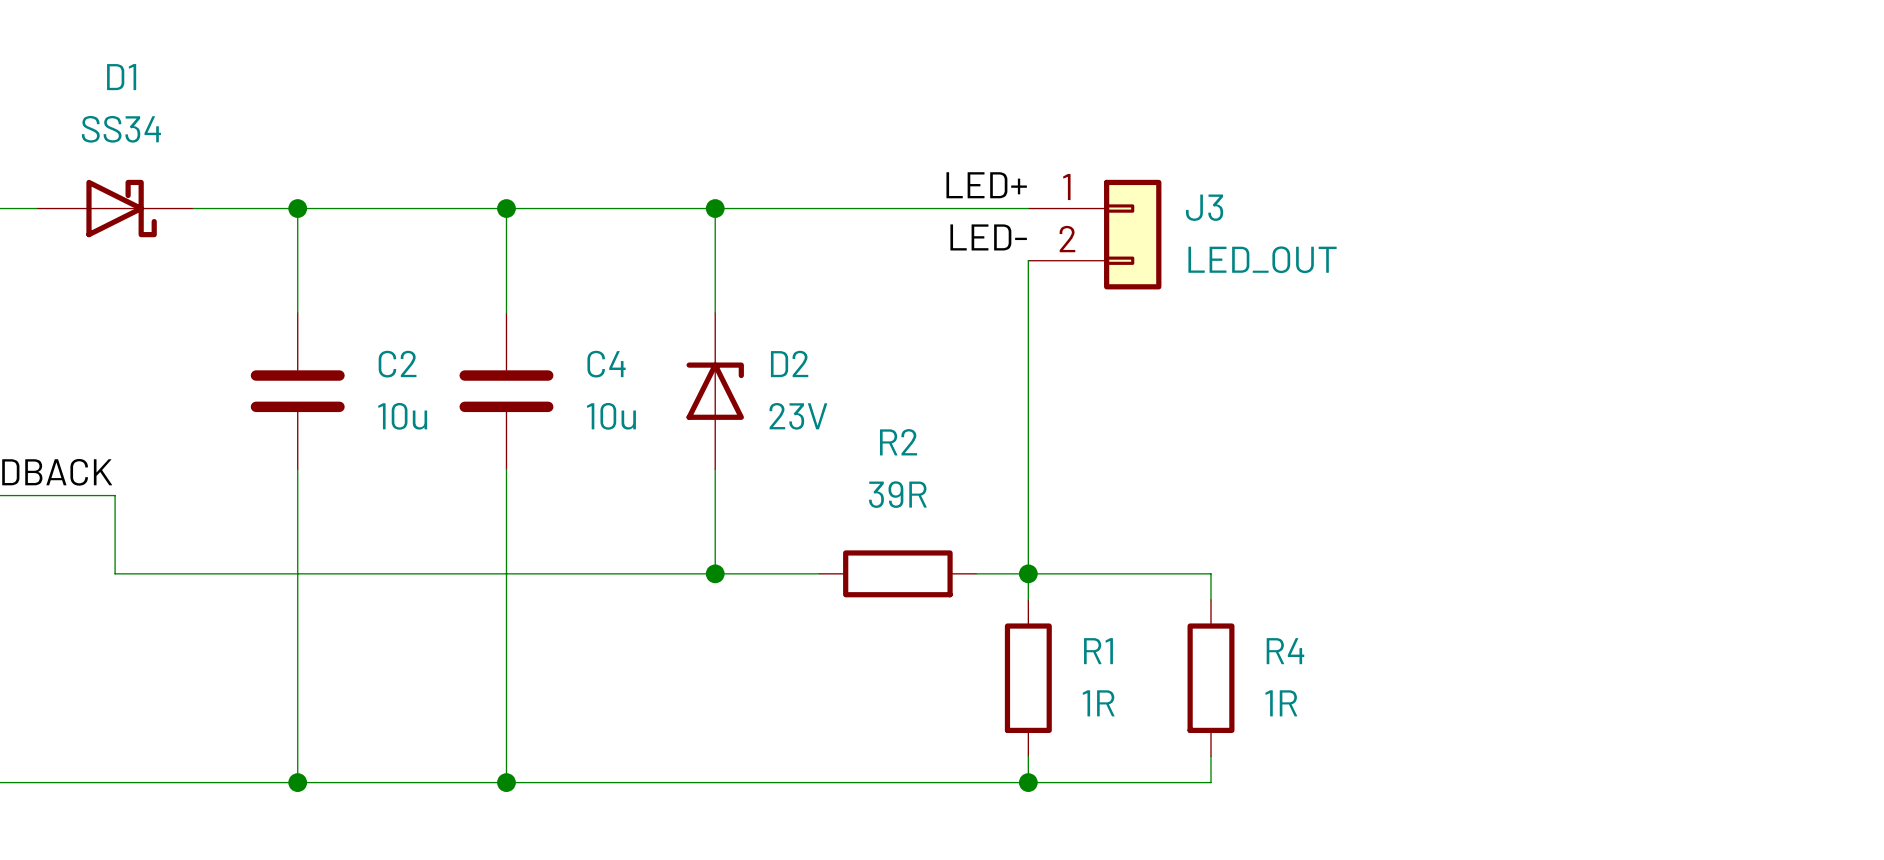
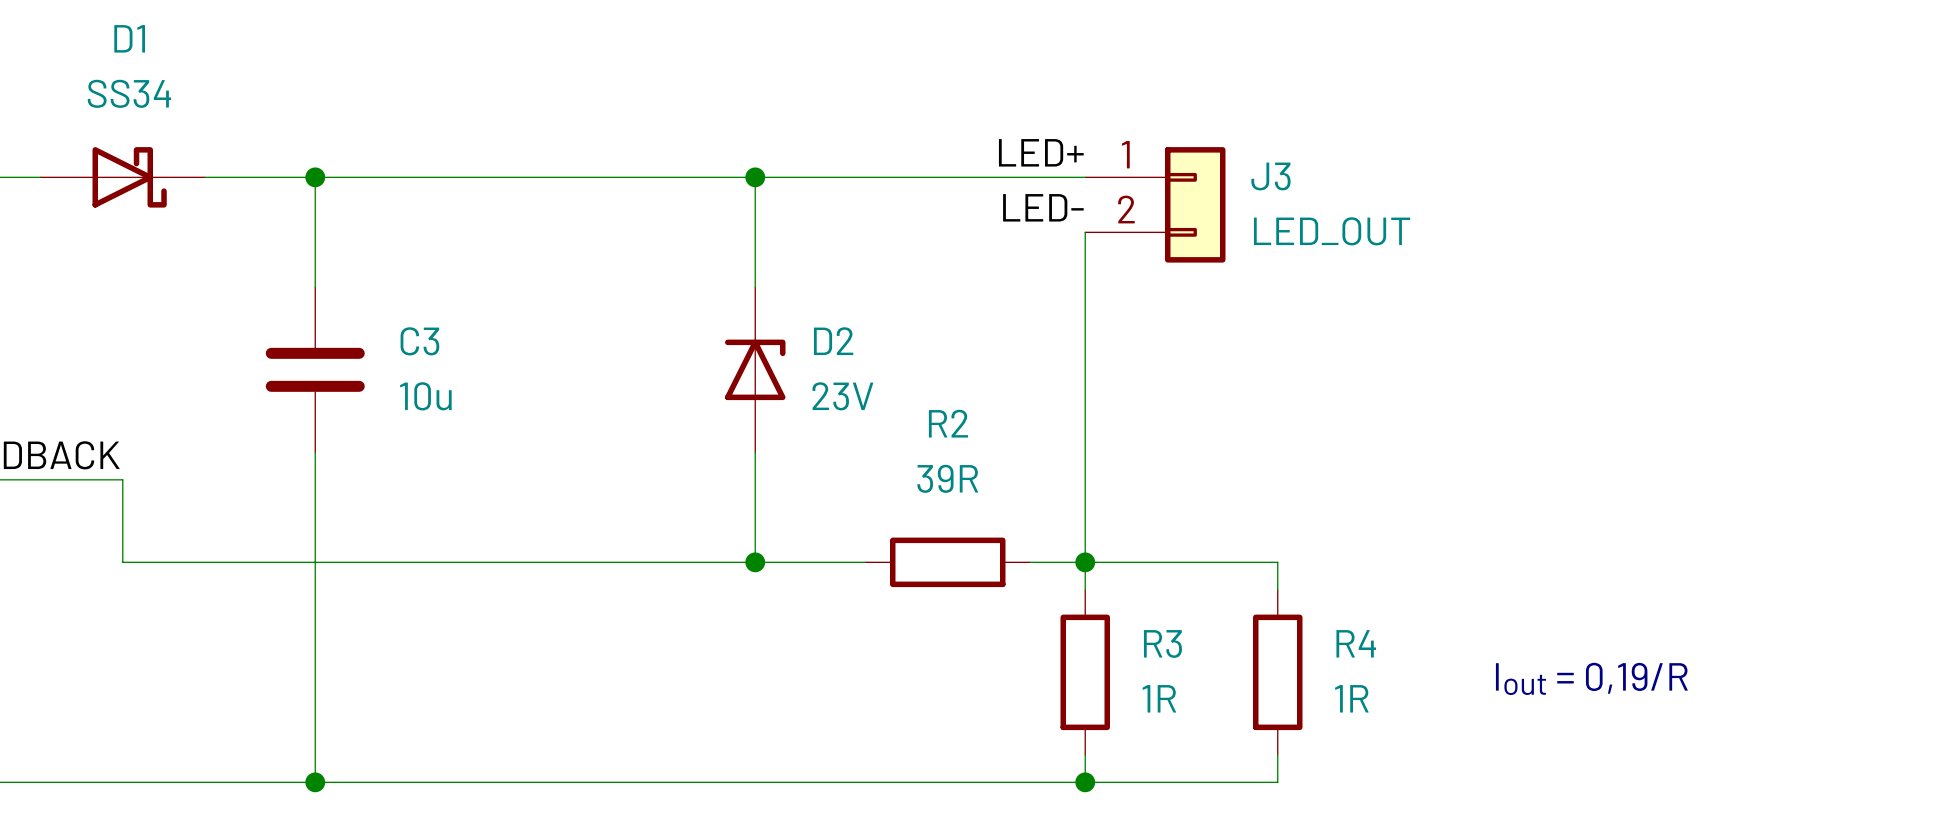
wire: (506, 208) (506, 312) -> none
junction: (506, 208) -> none
C2 name: C2 (397, 364) -> C3 (419, 341)
C4: 10u (506, 391) -> none
wire: (506, 469) (506, 782) -> none
R1 name: R1 (1098, 651) -> R3 (1162, 643)
text: none -> Iout = 0,19/R (1591, 678)
junction: (506, 782) -> none

